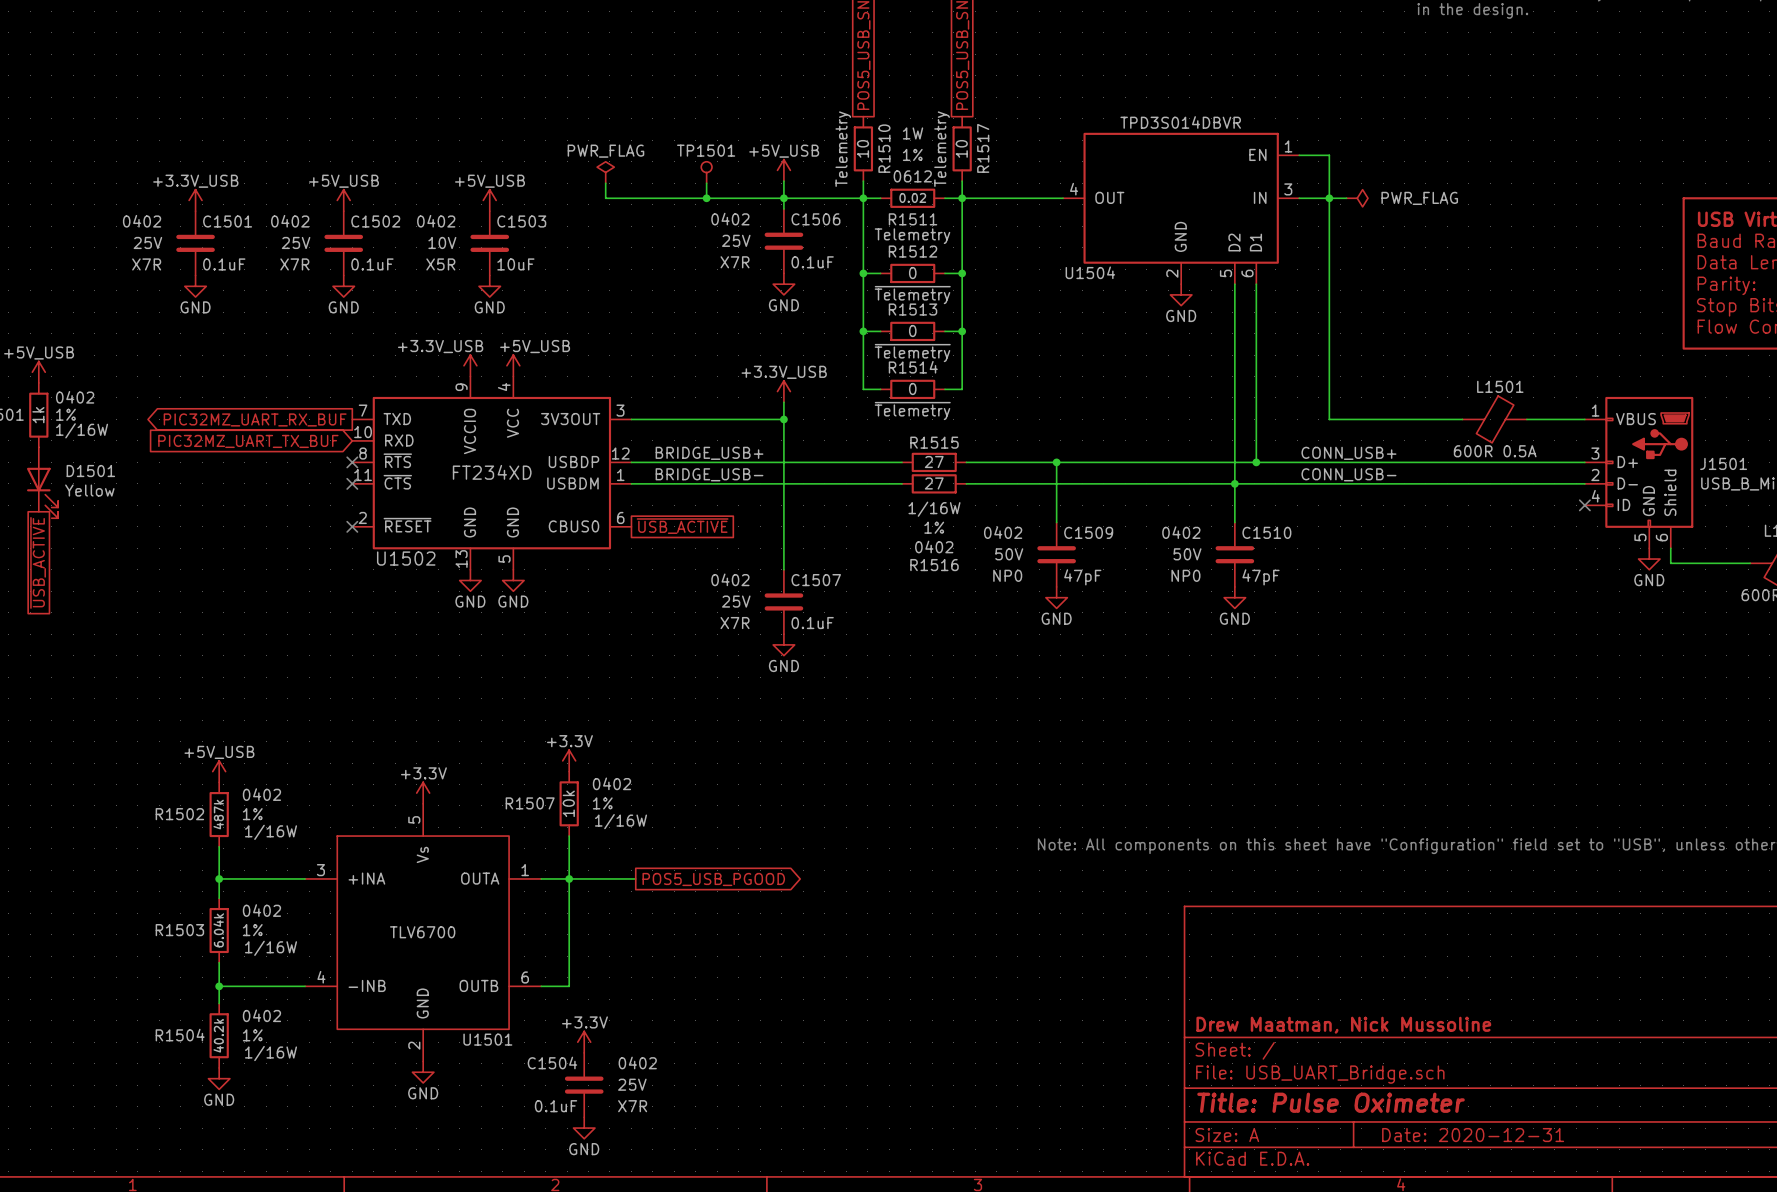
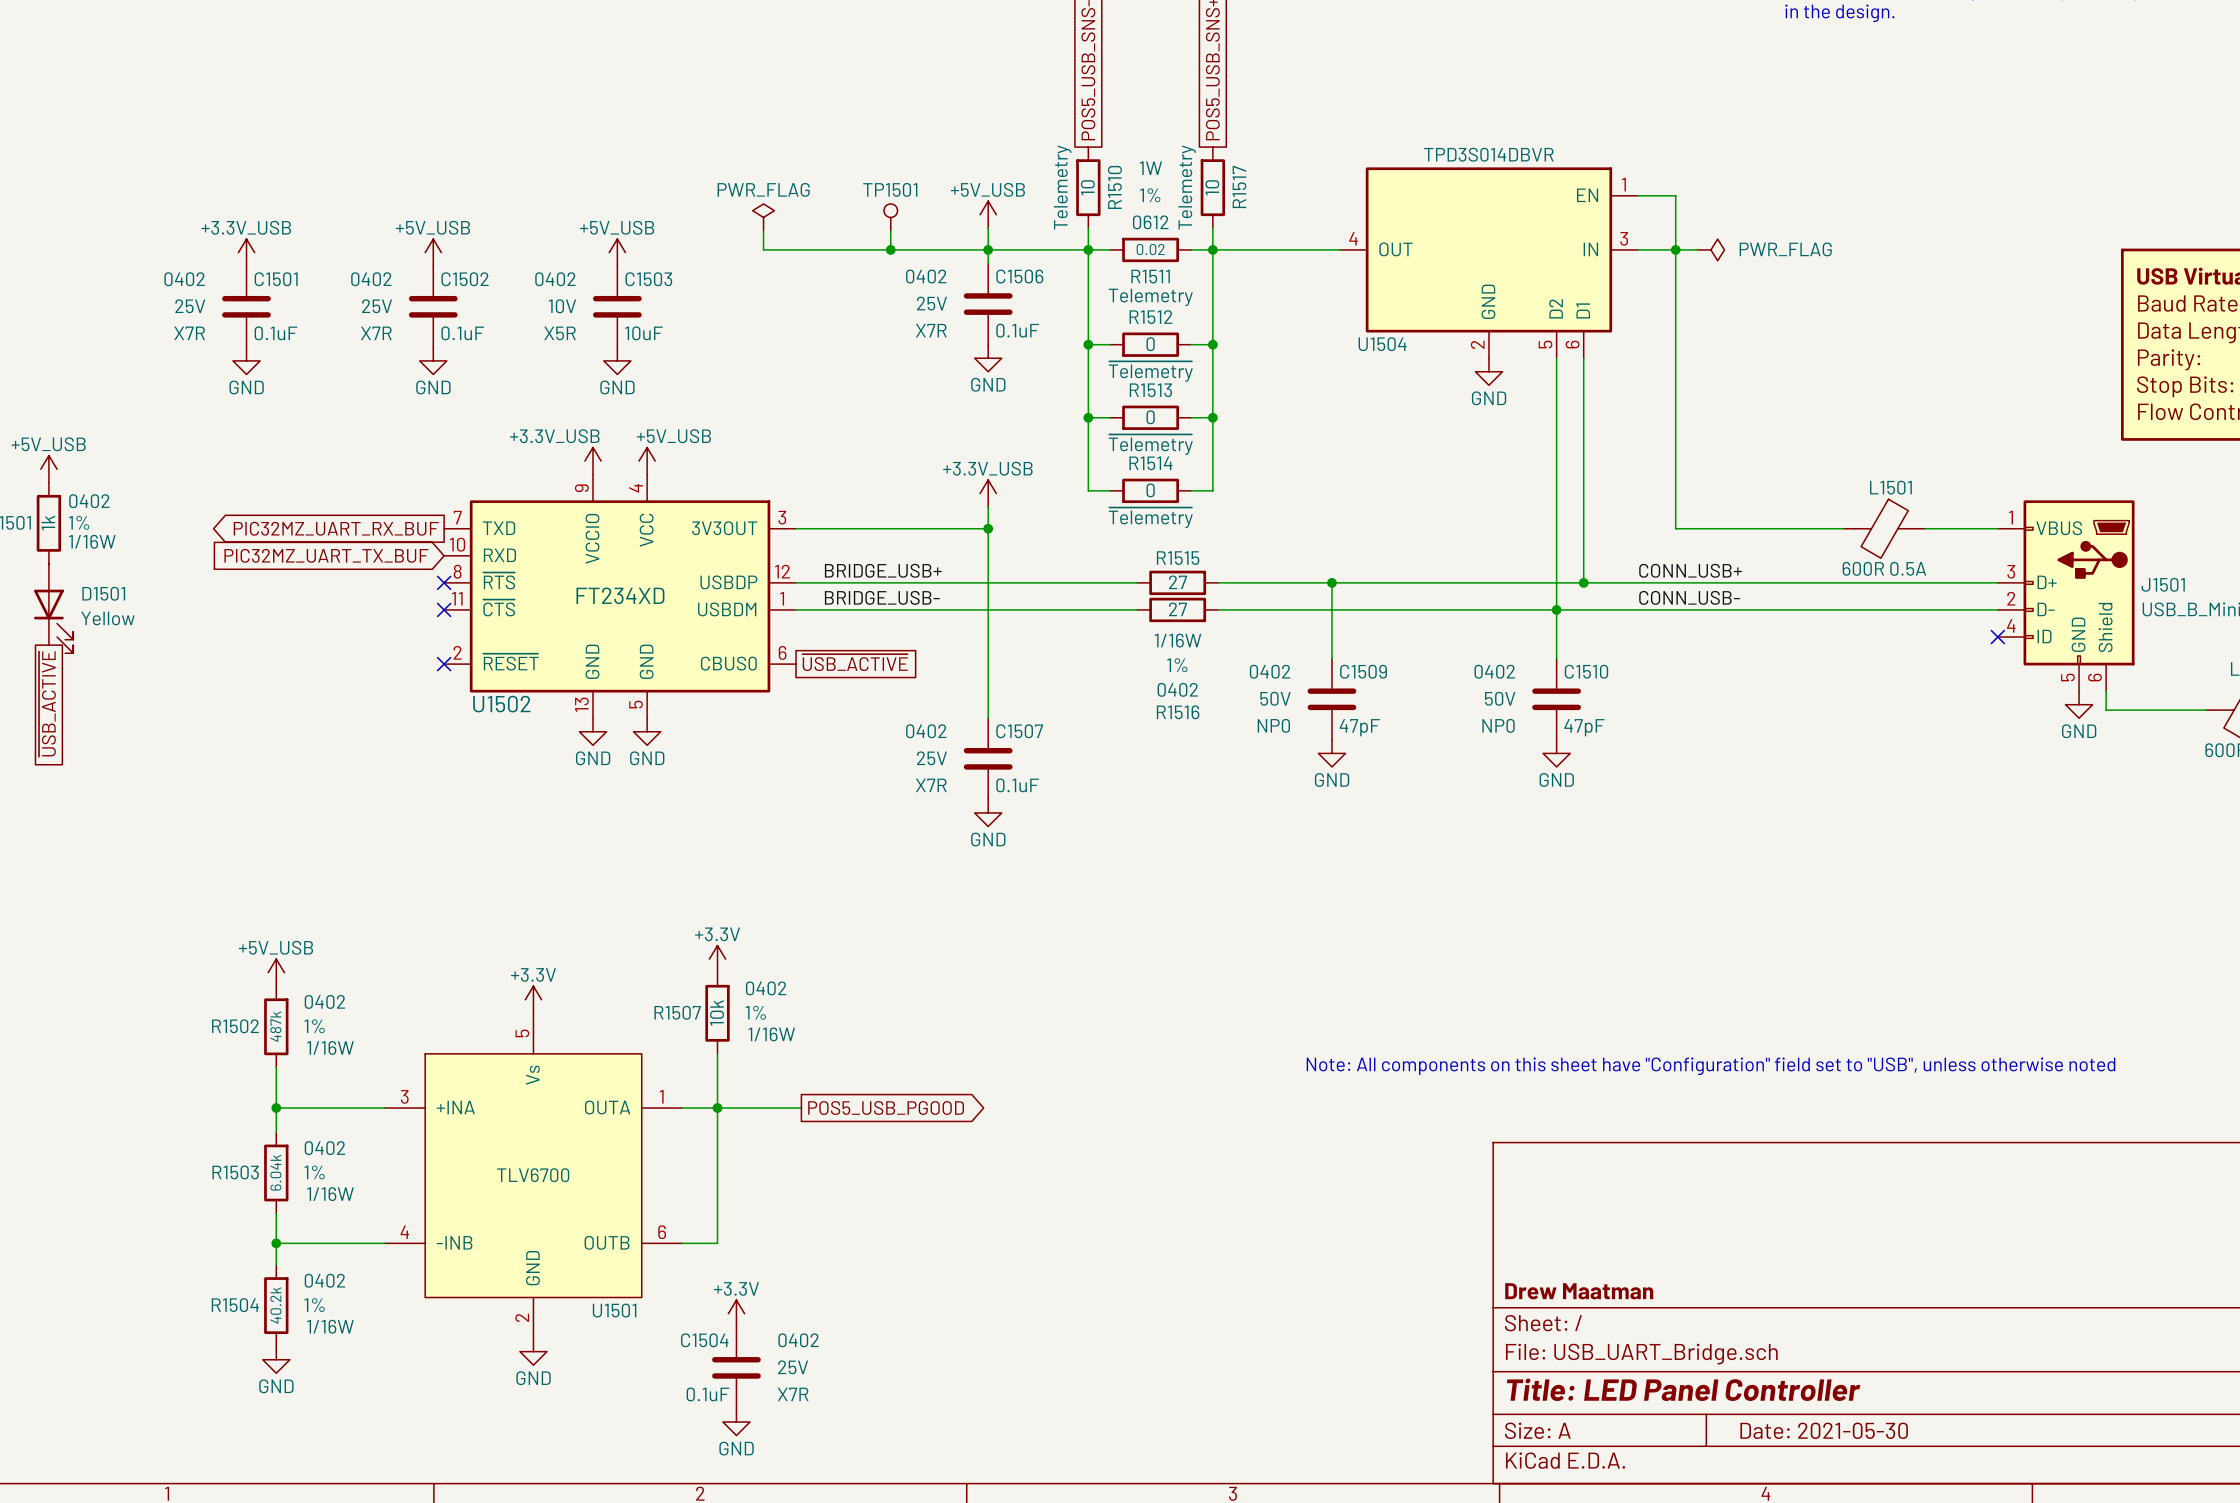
title block: Drew Maatman, Nick Mussoline (1343, 1025) -> Drew Maatman (1579, 1291)
title block: Title: Pulse Oximeter (1331, 1102) -> Title: LED Panel Controller (1683, 1389)
title block: Date: 2020-12-31 (1473, 1135) -> Date: 2021-05-30 (1824, 1430)

